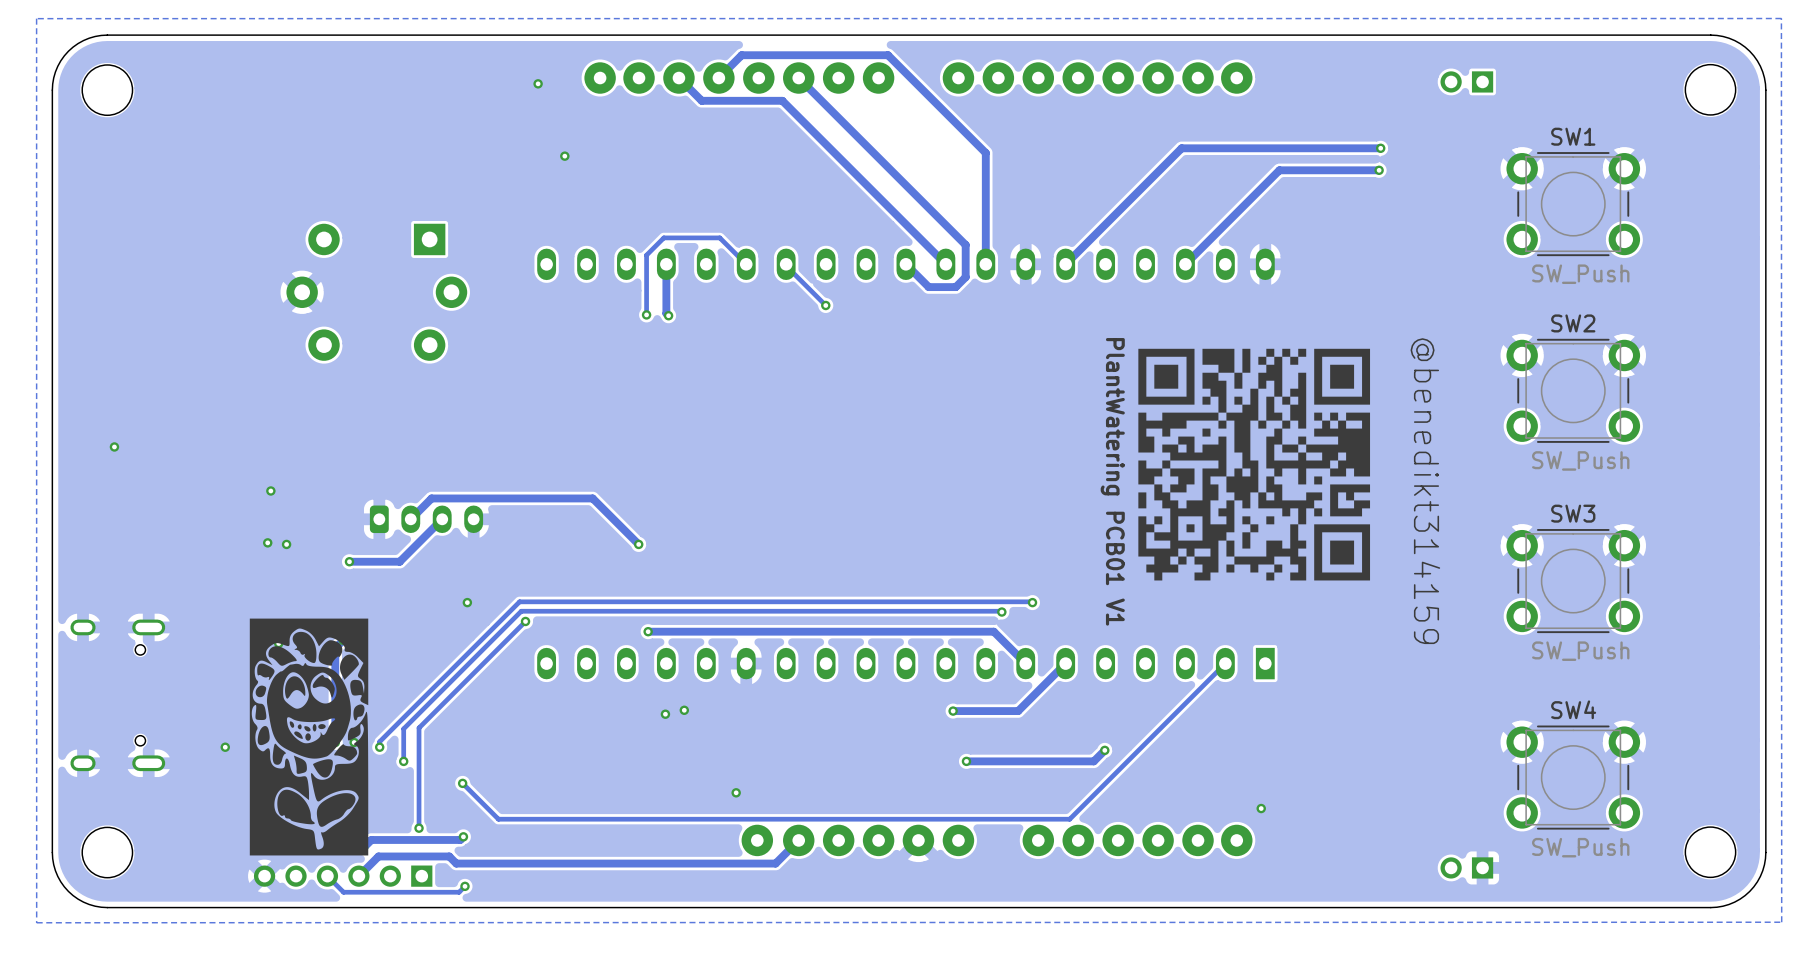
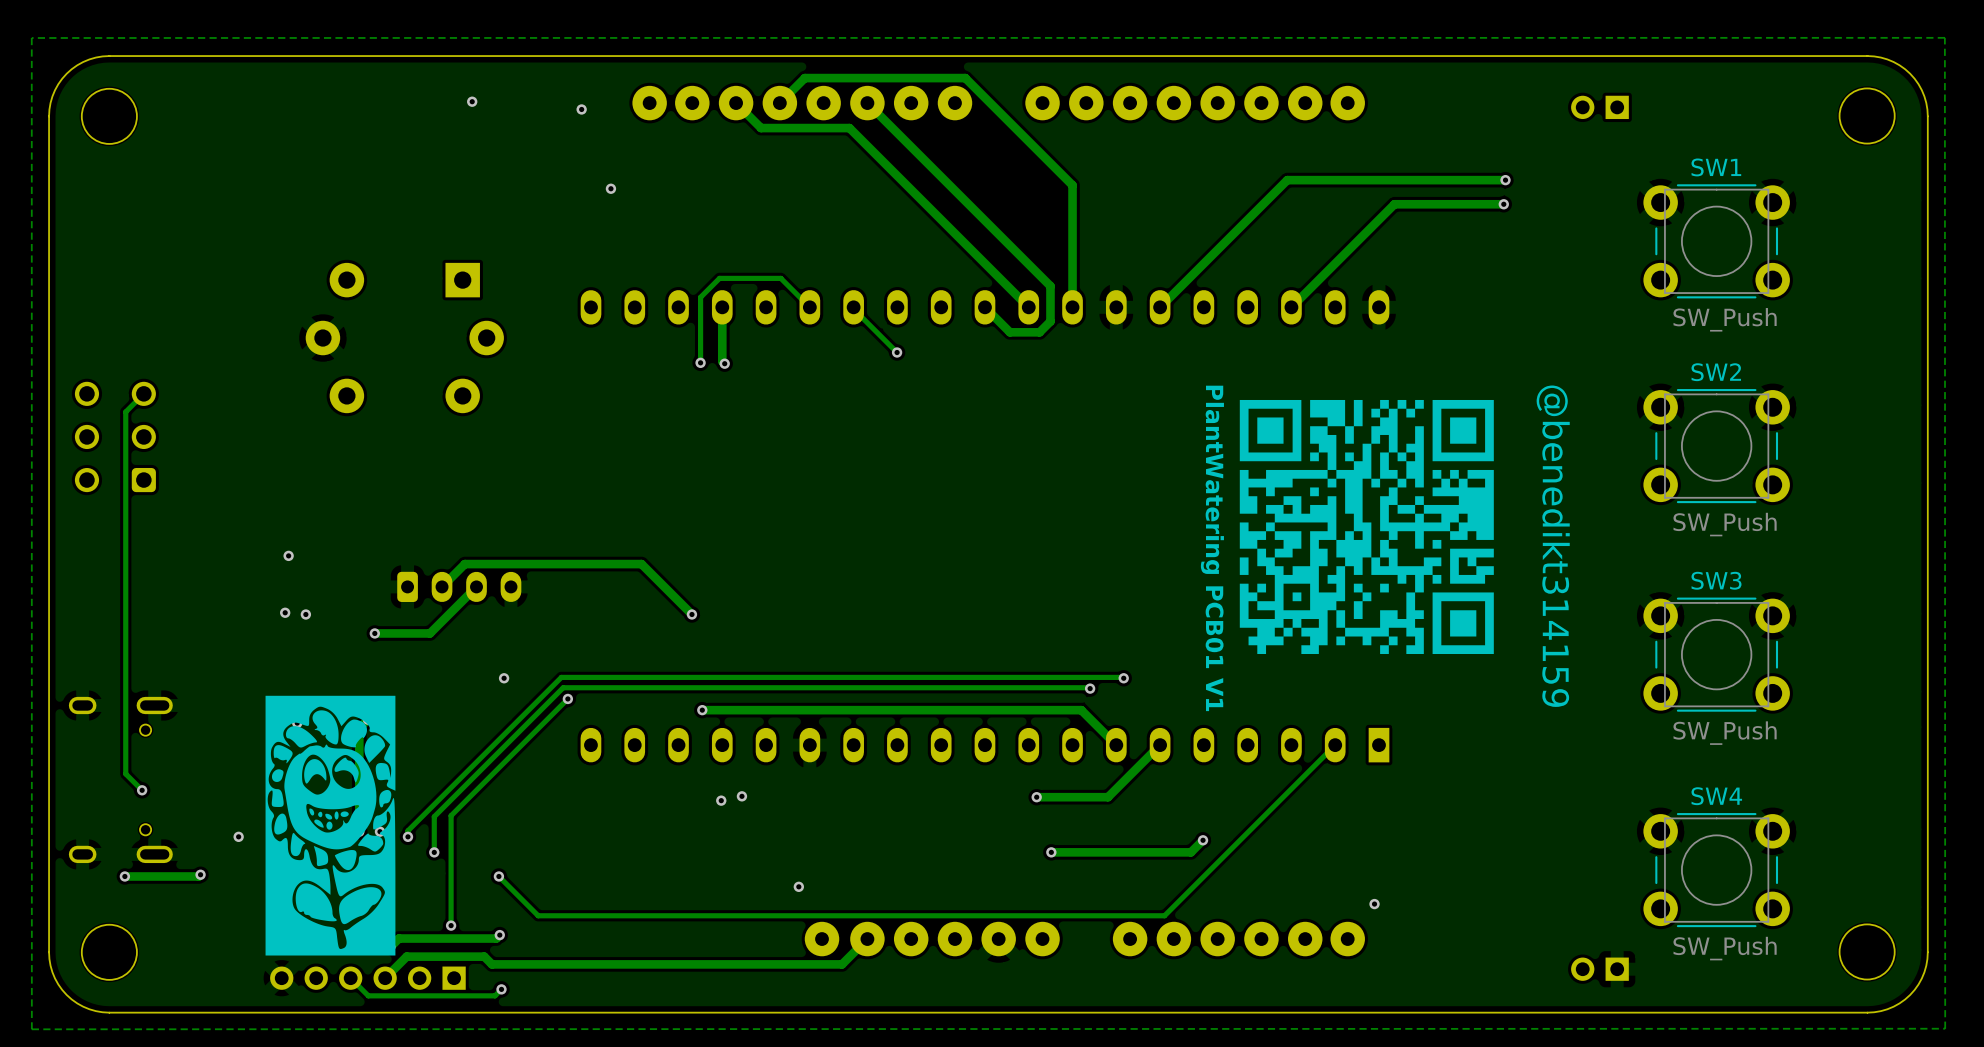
via: none -> (472, 101)
track: none -> (143, 393) (125, 411) (125, 773) (142, 790)
part: none -> (115, 436)
via: (114, 446) -> none
via: none -> (142, 790)
track: none -> (200, 874) (198, 876) (124, 876)
via: none -> (200, 874)
via: none -> (124, 876)

